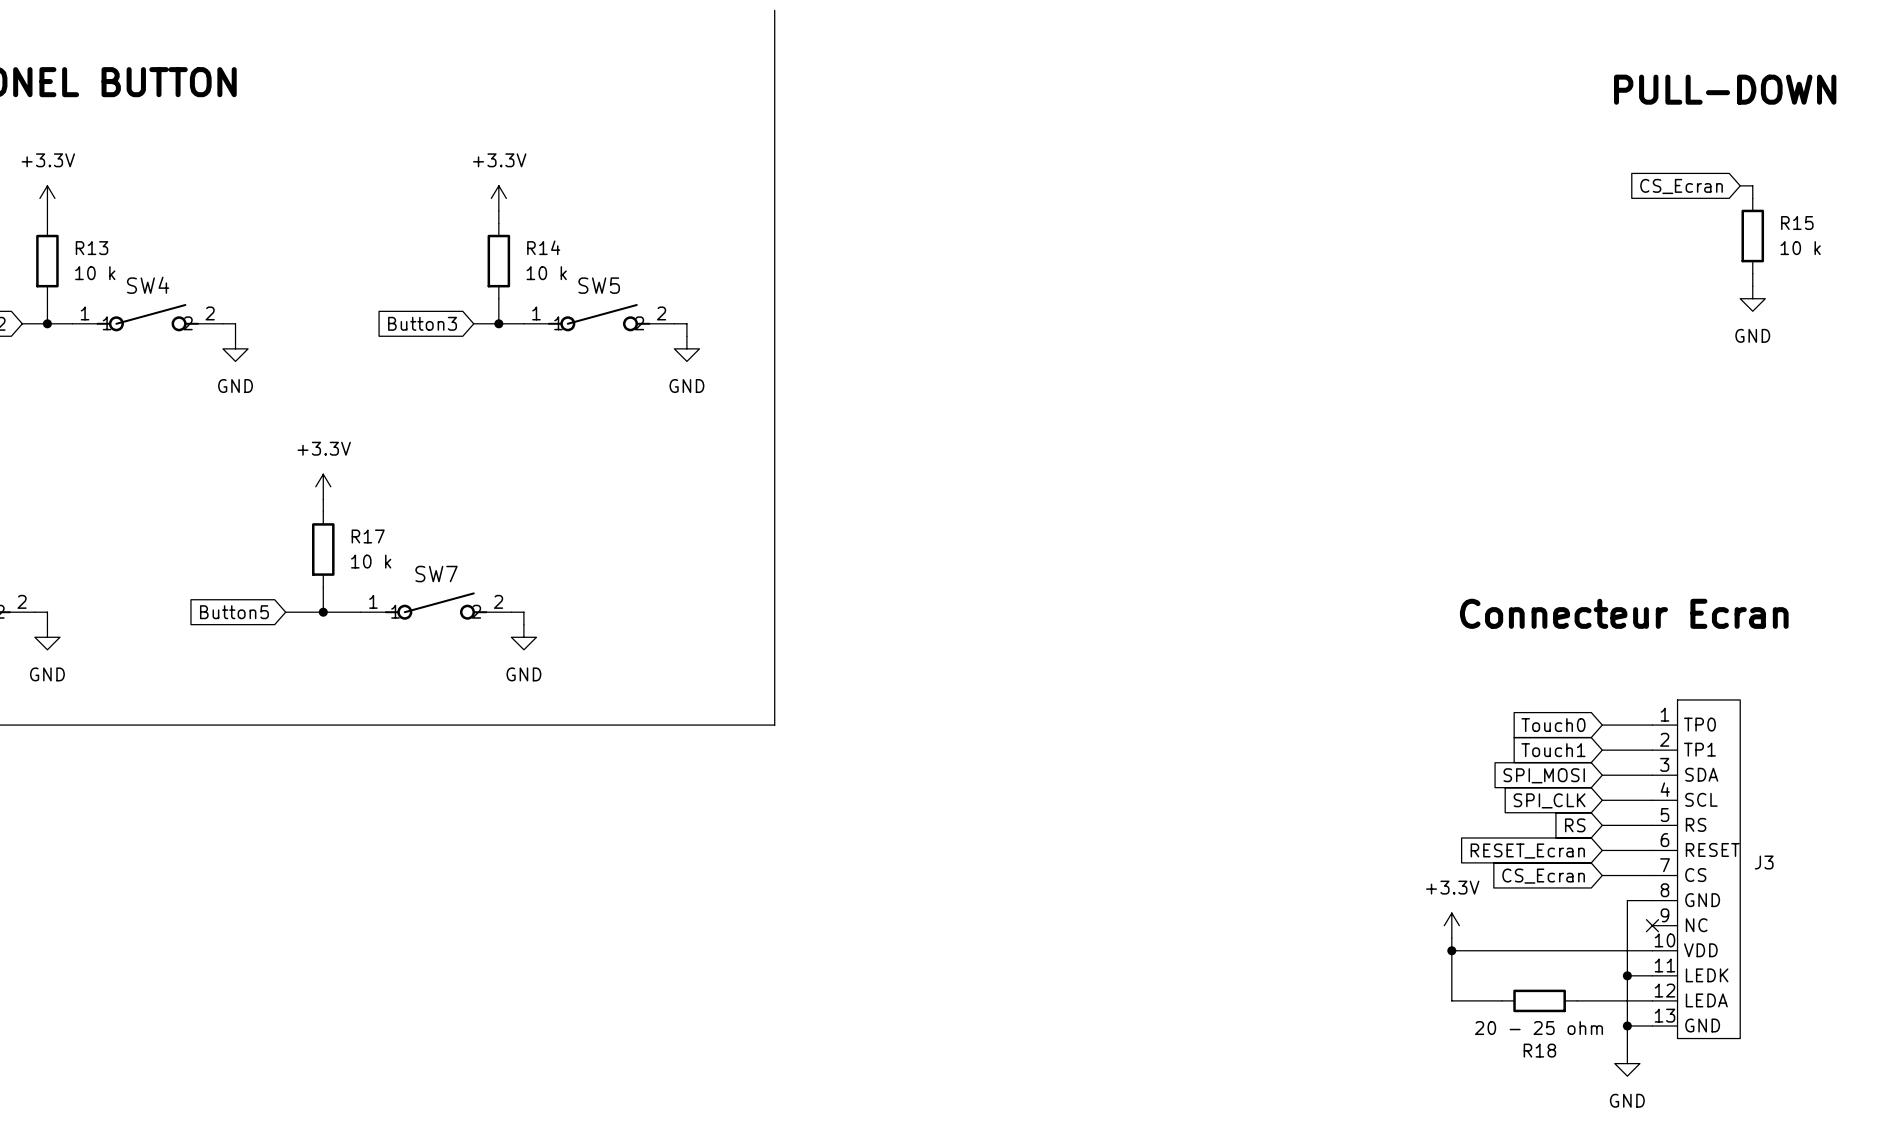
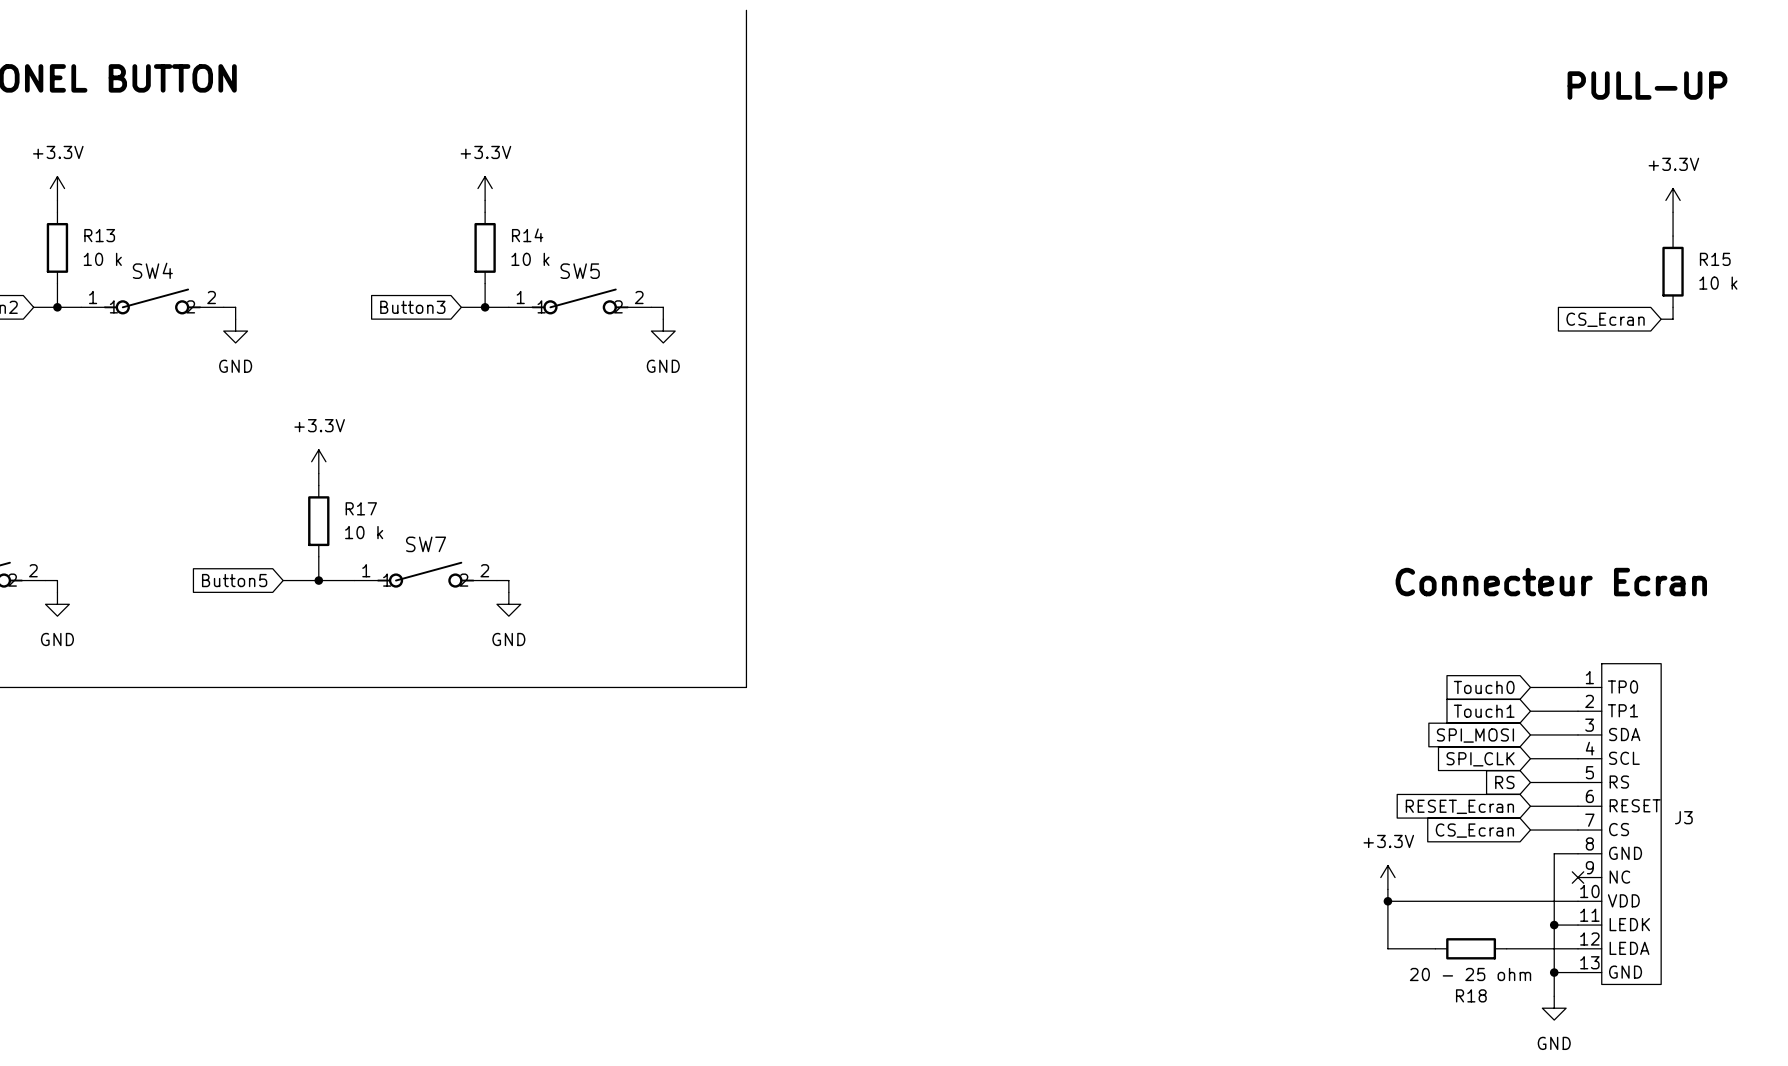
text: PULL-DOWN (1725, 89) -> PULL-UP (1647, 85)
wire: (1740, 185) (1752, 185) (1752, 198) -> none
global label position: CS_Ecran (1681, 186) -> CS_Ecran (1605, 319)
power symbol: none -> +3.3V (1673, 200)
wire: none -> (1673, 212) (1673, 236)
R15 position: (1752, 236) -> (1673, 271)
wire: (1752, 273) (1752, 286) -> none
power symbol: GND (1752, 298) -> none
wire: none -> (1673, 307) (1673, 319) (1661, 319)

